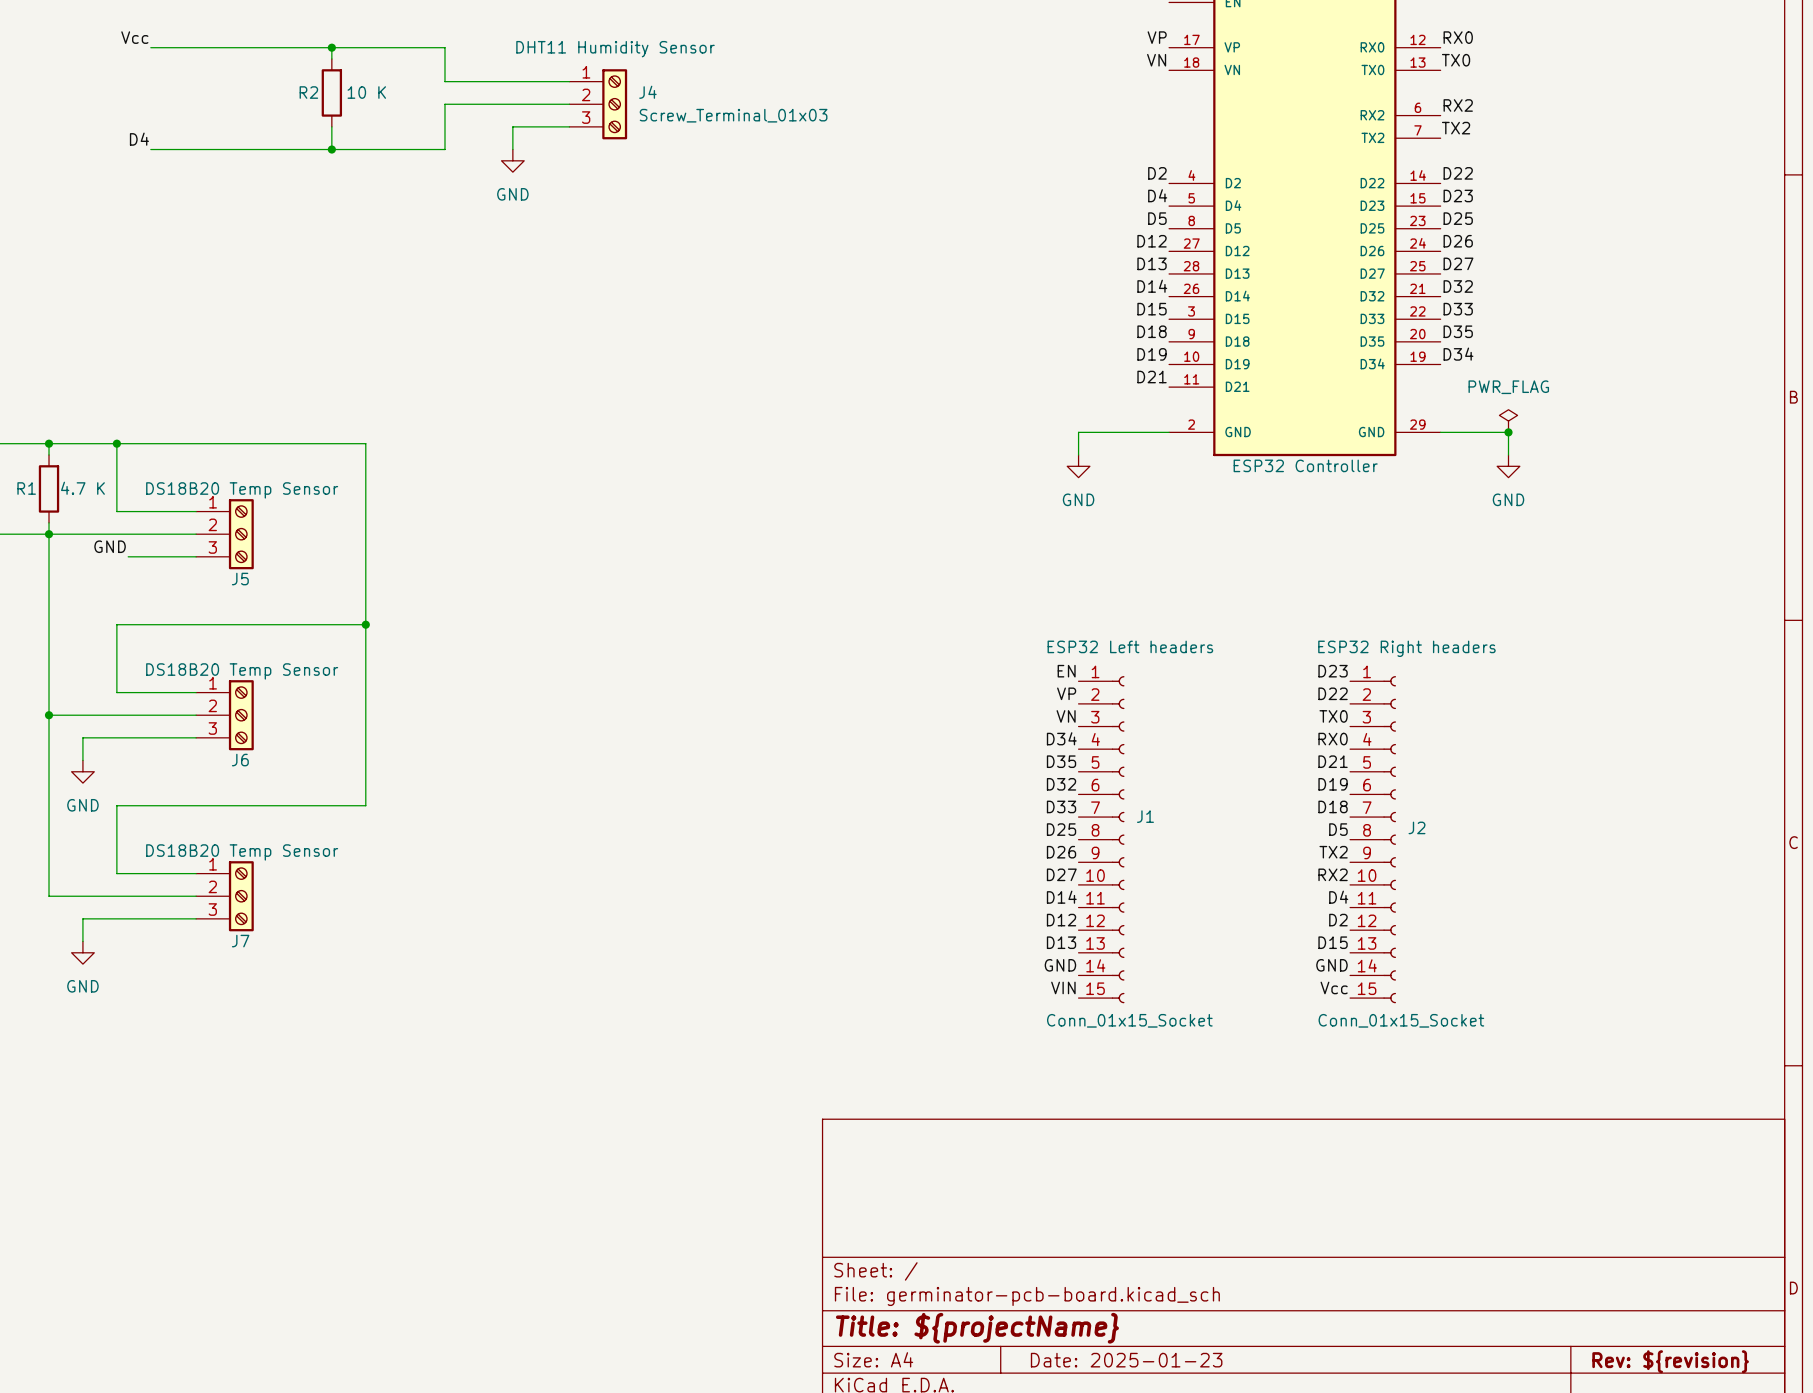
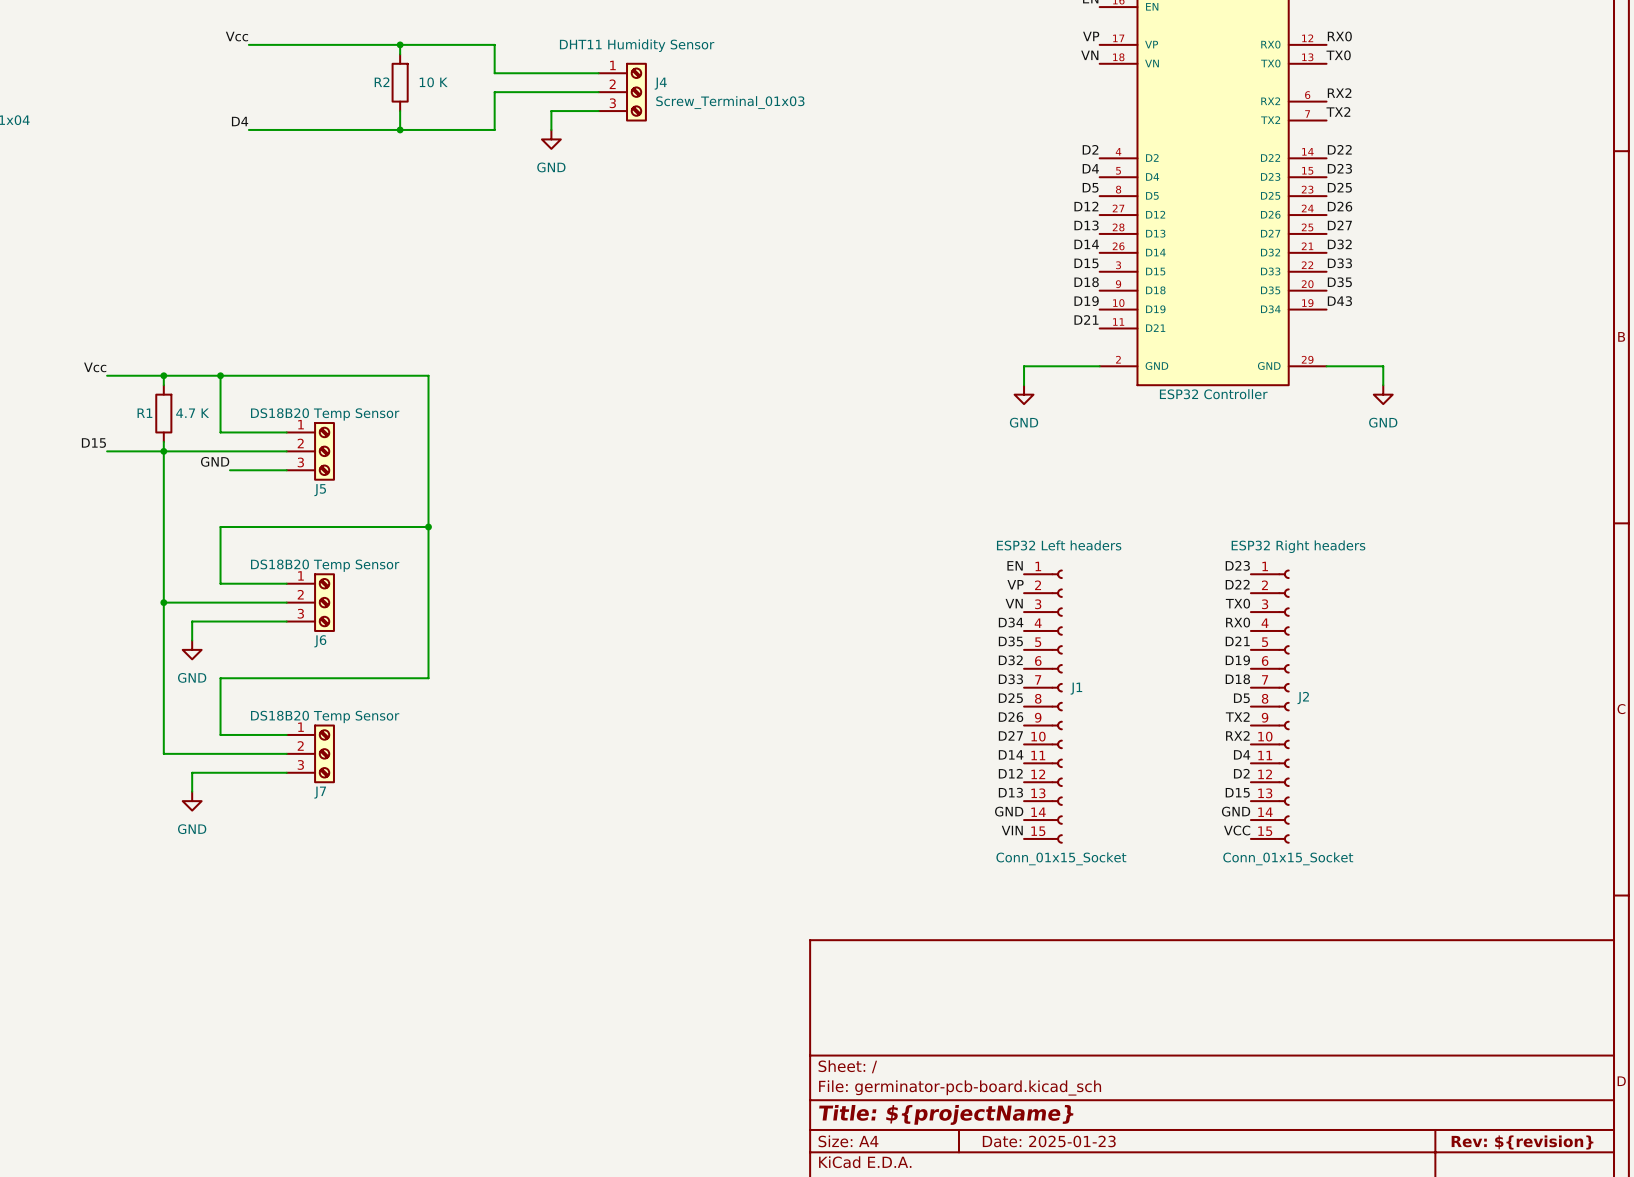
label: D34 (1458, 354) -> D43 (1339, 301)
power symbol: PWR_FLAG (1508, 421) -> none
junction: (1508, 432) -> none
label: Vcc (1334, 987) -> VCC (1237, 830)

